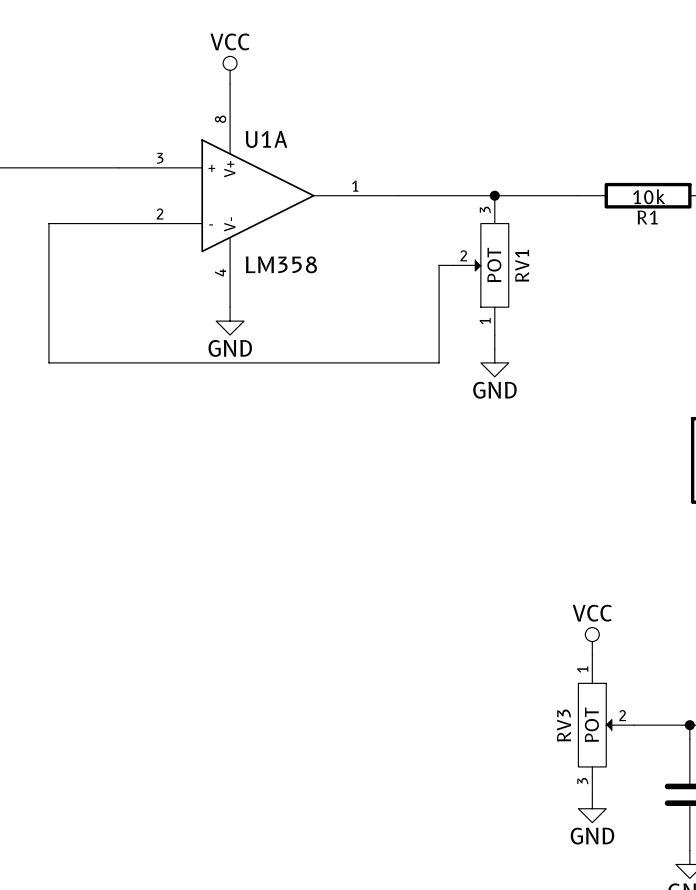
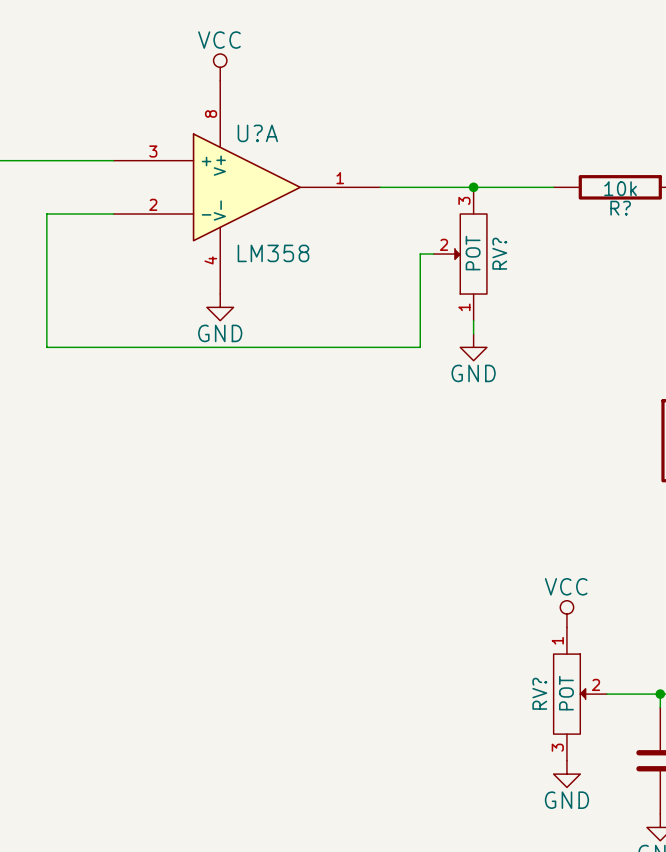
U1A name: U1A (266, 139) -> U?A (257, 133)
R1 name: R1 (647, 217) -> R? (620, 208)
RV1 name: RV1 (522, 265) -> RV? (499, 253)
RV3 name: RV3 (564, 725) -> RV? (539, 693)

